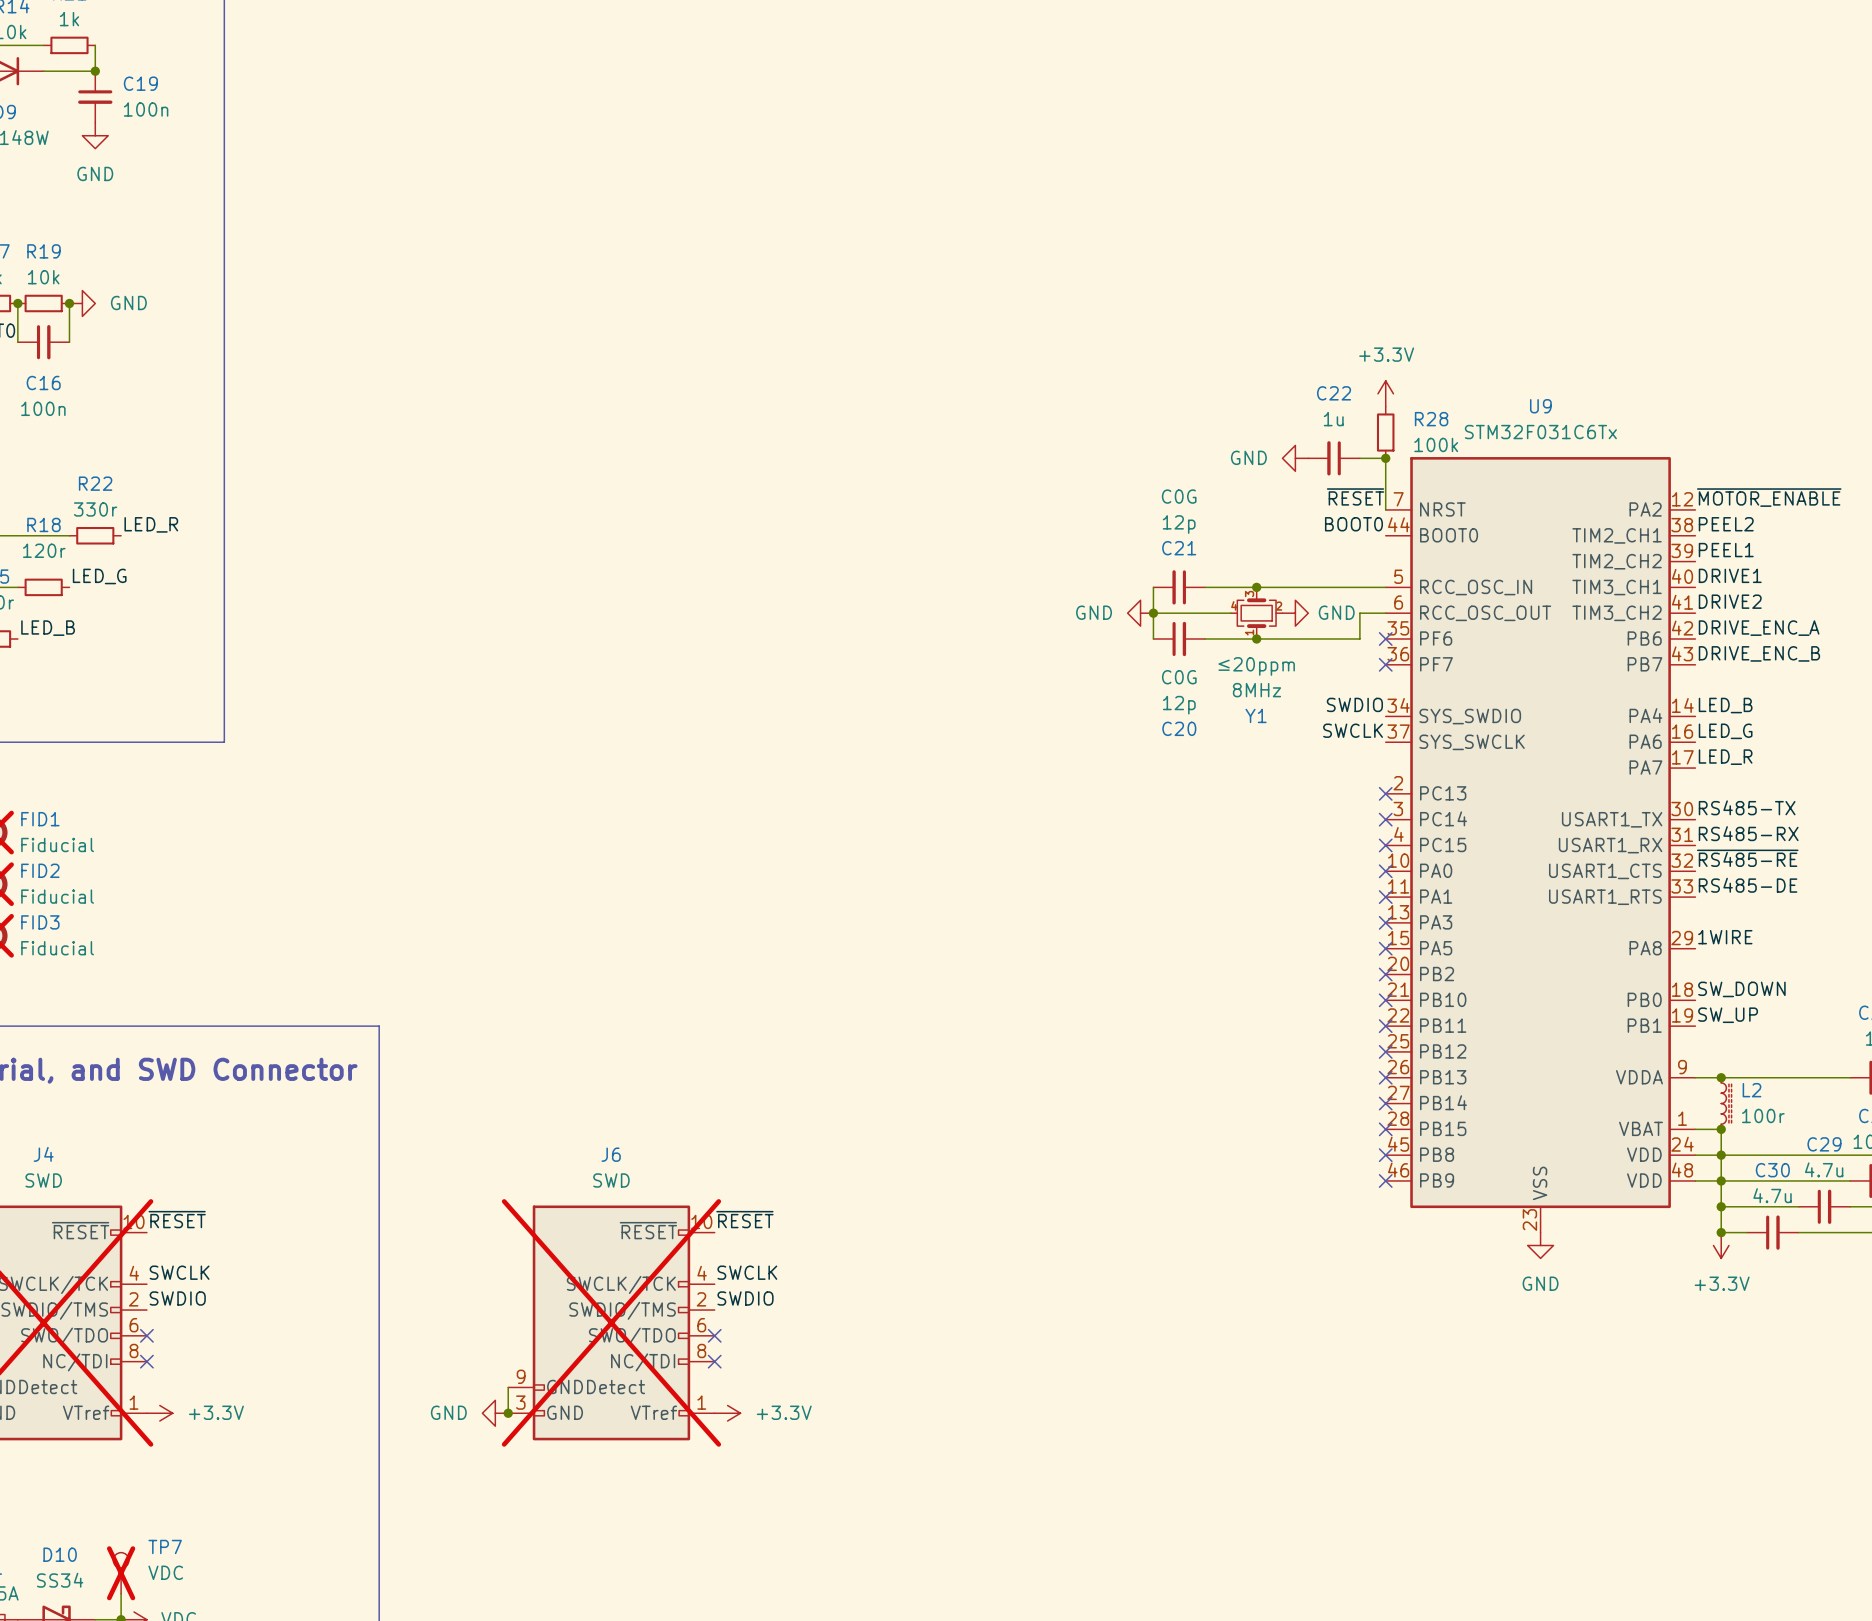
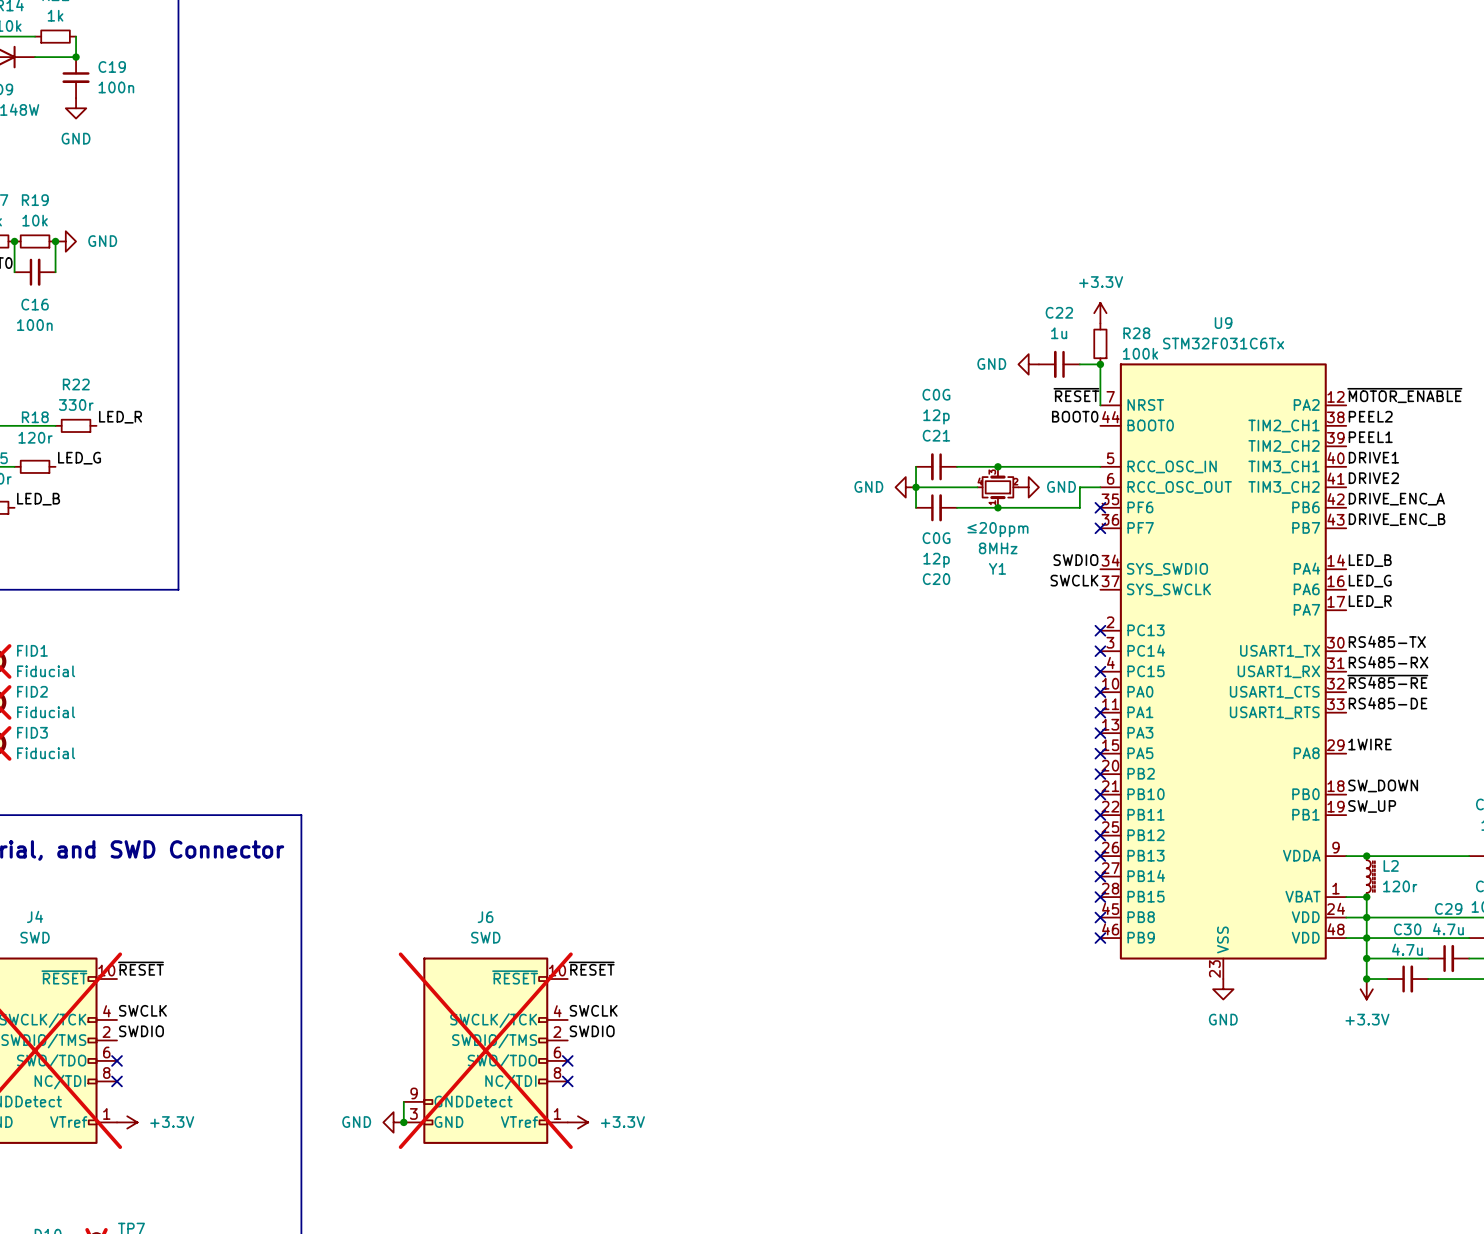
L2 value: 100r (1763, 1115) -> 120r (1400, 886)

